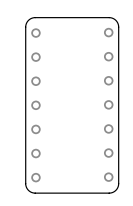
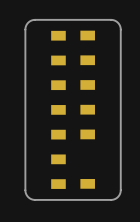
part: (108, 104) -> none
part: (35, 105) -> none
part: none -> (73, 109)

